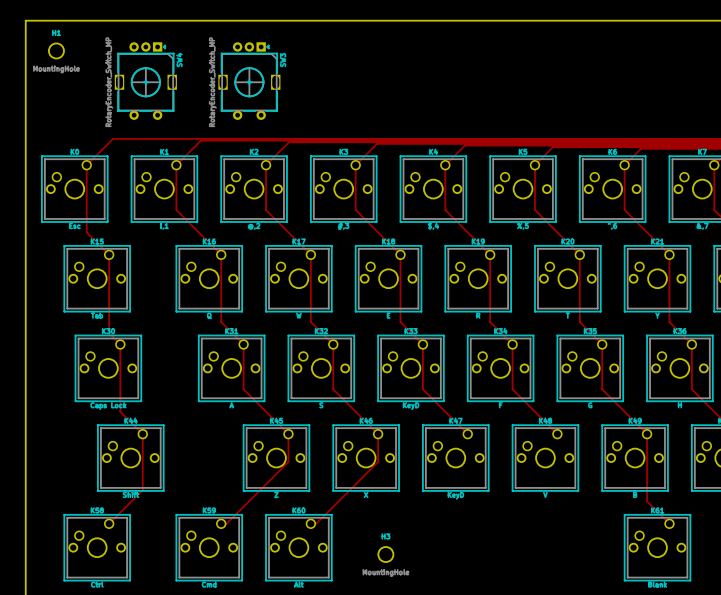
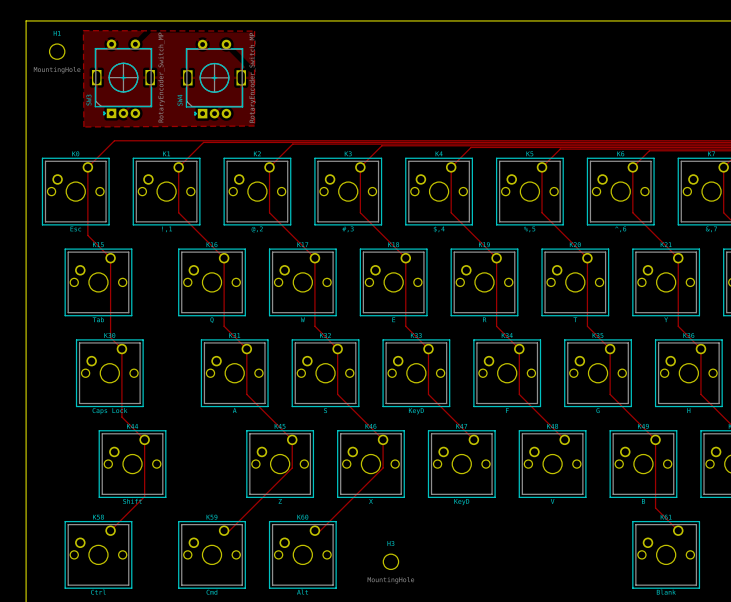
zone outline: none -> (83, 30) (254, 31) (254, 126) (83, 126) (83, 30)
part rotation: 0° (145, 81) -> 180° (214, 79)
part position: (145, 81) -> (214, 79)
part rotation: 0° (249, 81) -> 180° (123, 78)
part position: (249, 81) -> (123, 78)

